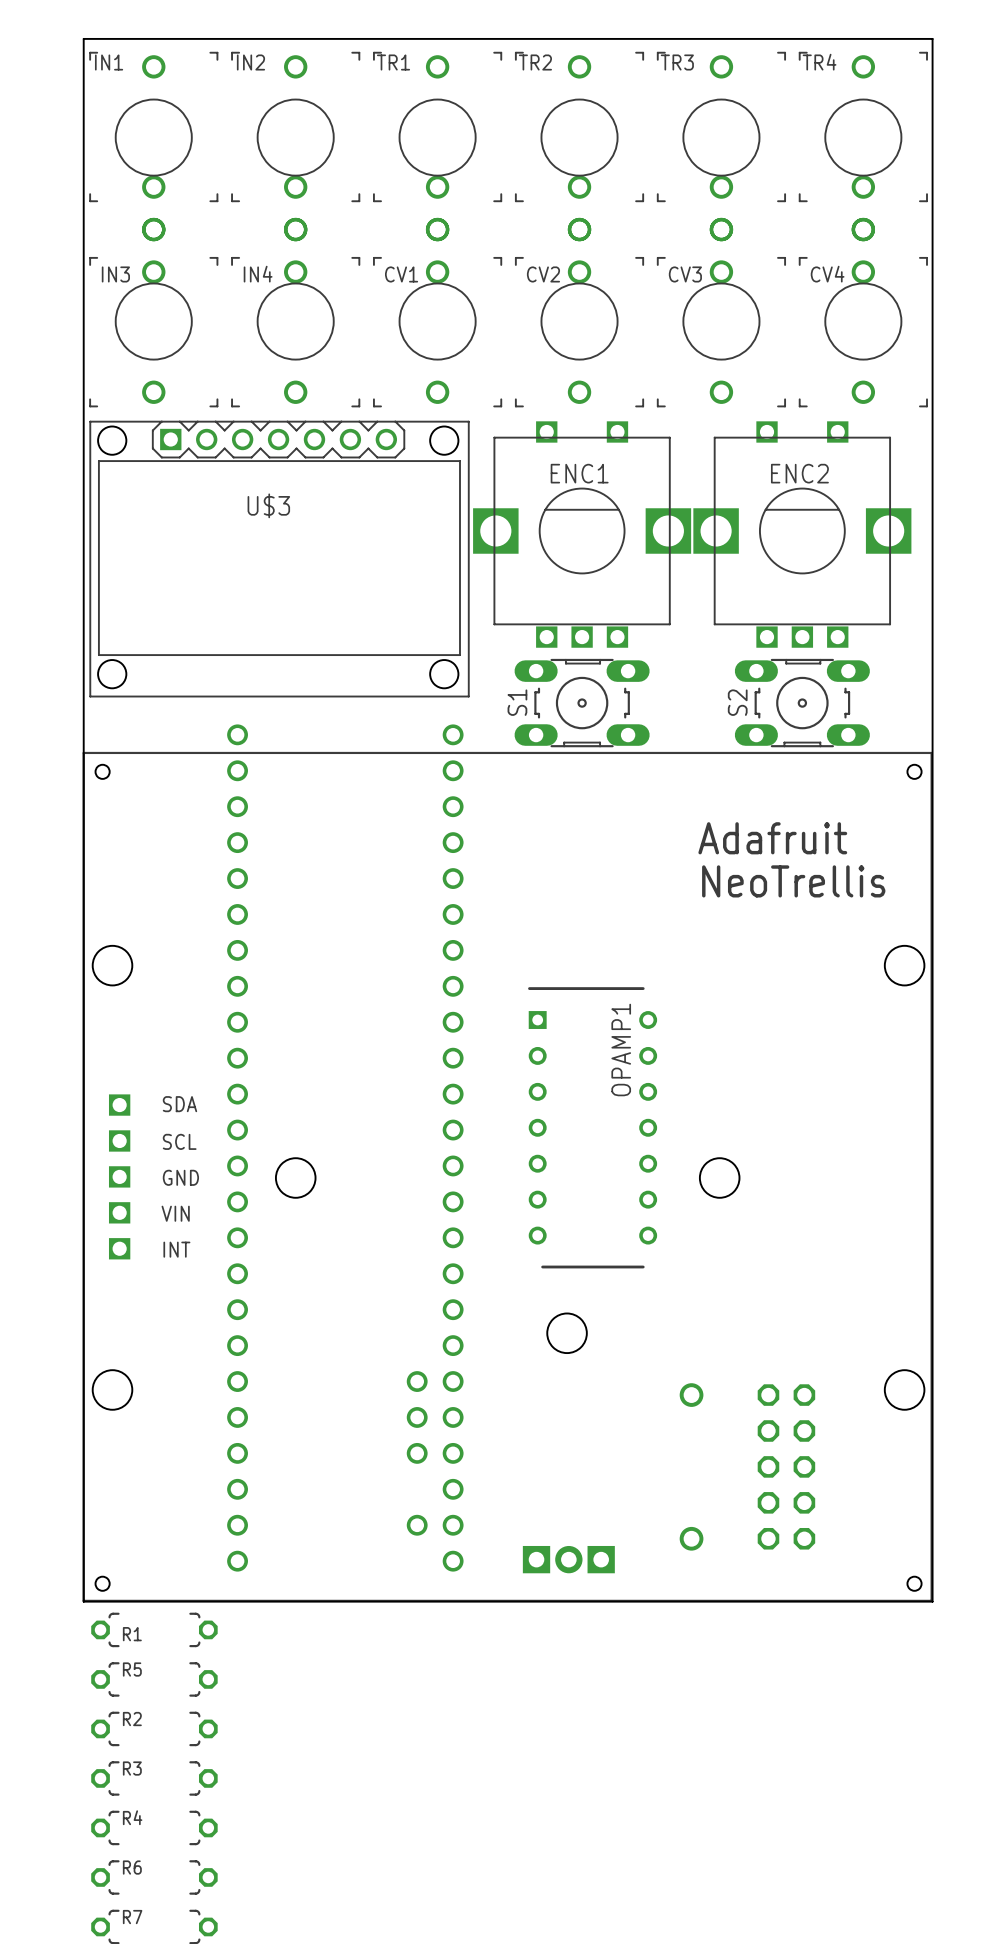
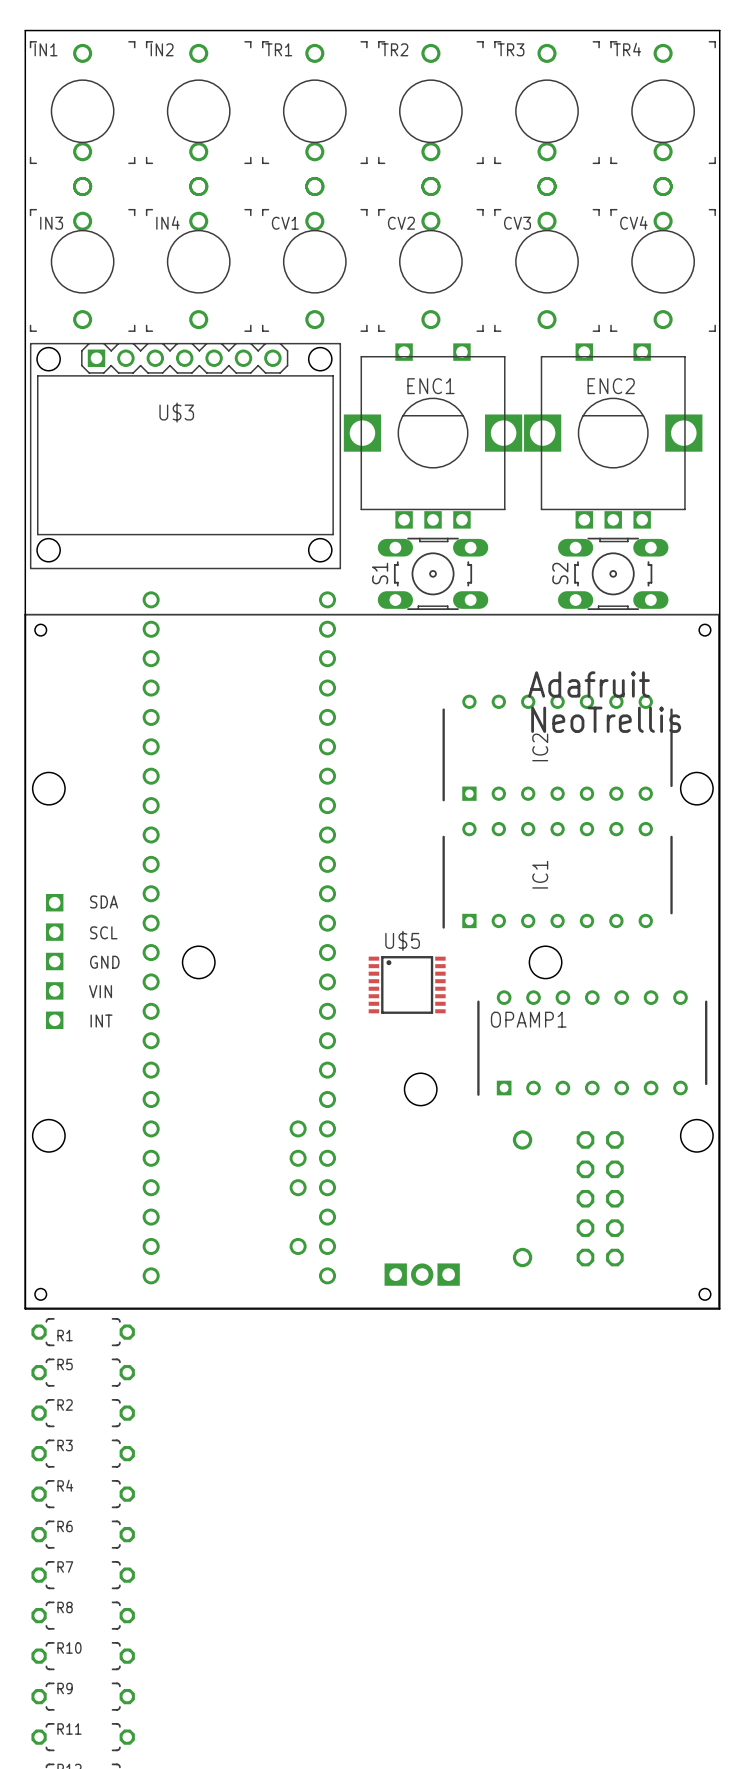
IC2: none -> (557, 748)
IC1: none -> (557, 875)
OPAMP1 rotation: 0° (592, 1127) -> 90° counterclockwise (592, 1043)
OPAMP1 position: (592, 1127) -> (592, 1043)
U$5: none -> (407, 984)

